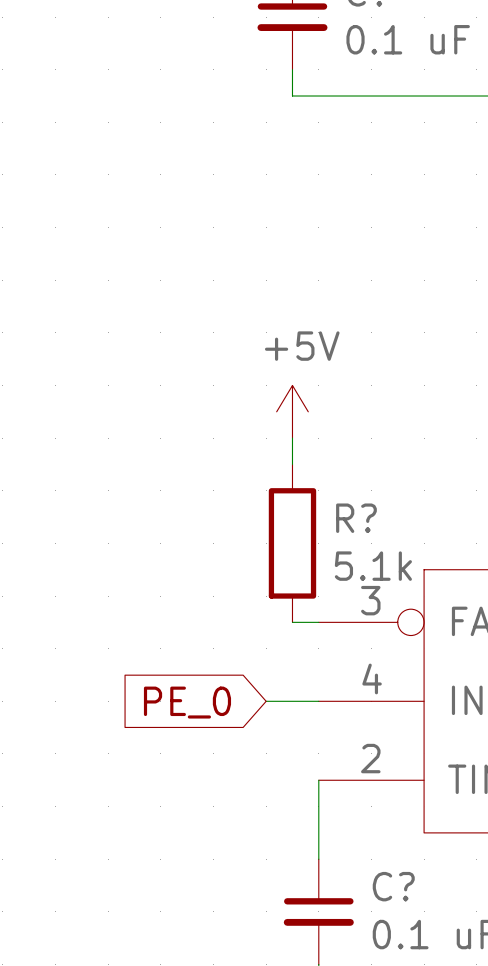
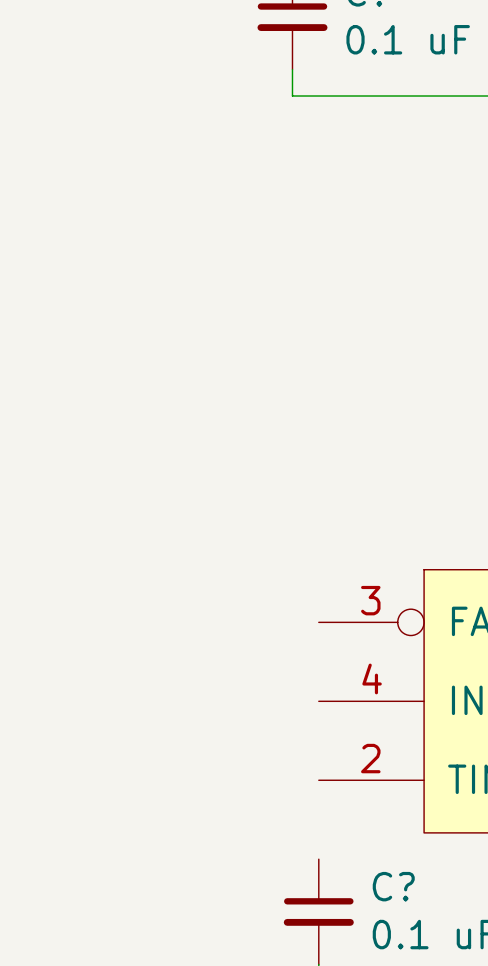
power symbol: +5V (292, 411) -> none
wire: (292, 438) (292, 464) -> none
R?: 5.1k (292, 543) -> none
wire: (292, 622) (318, 622) -> none
wire: (266, 701) (318, 701) -> none
global label: PE_0 (187, 702) -> none
wire: (318, 780) (318, 859) -> none

